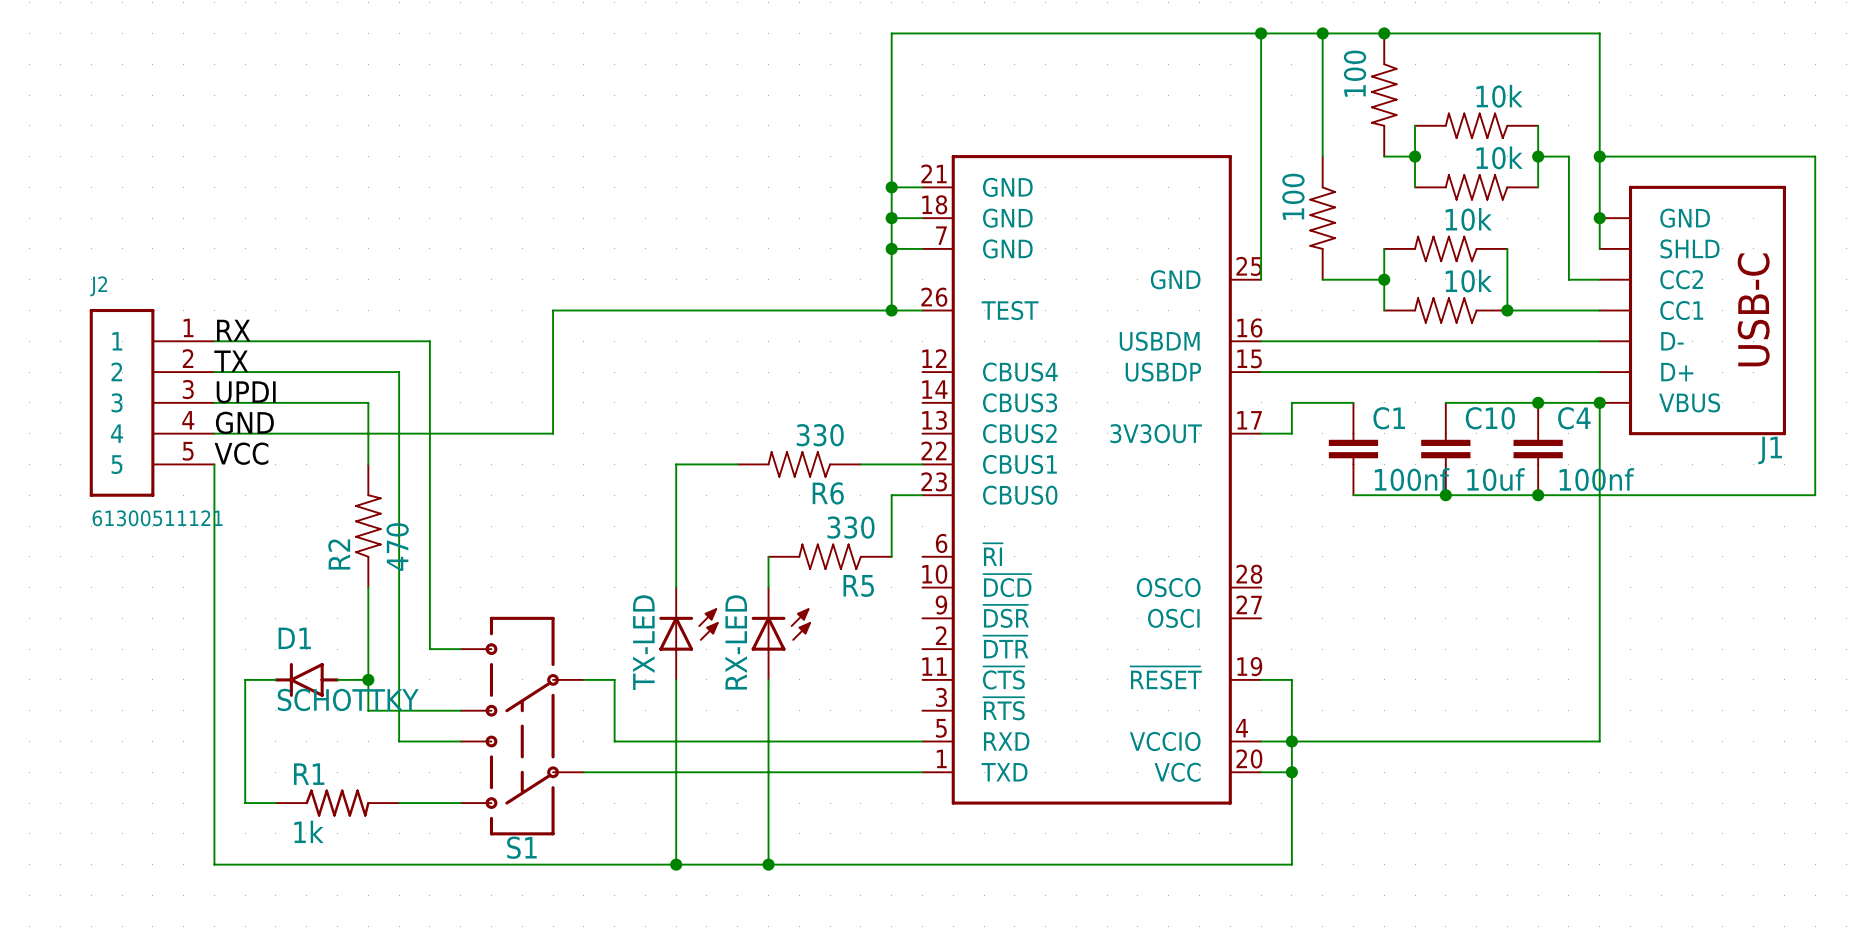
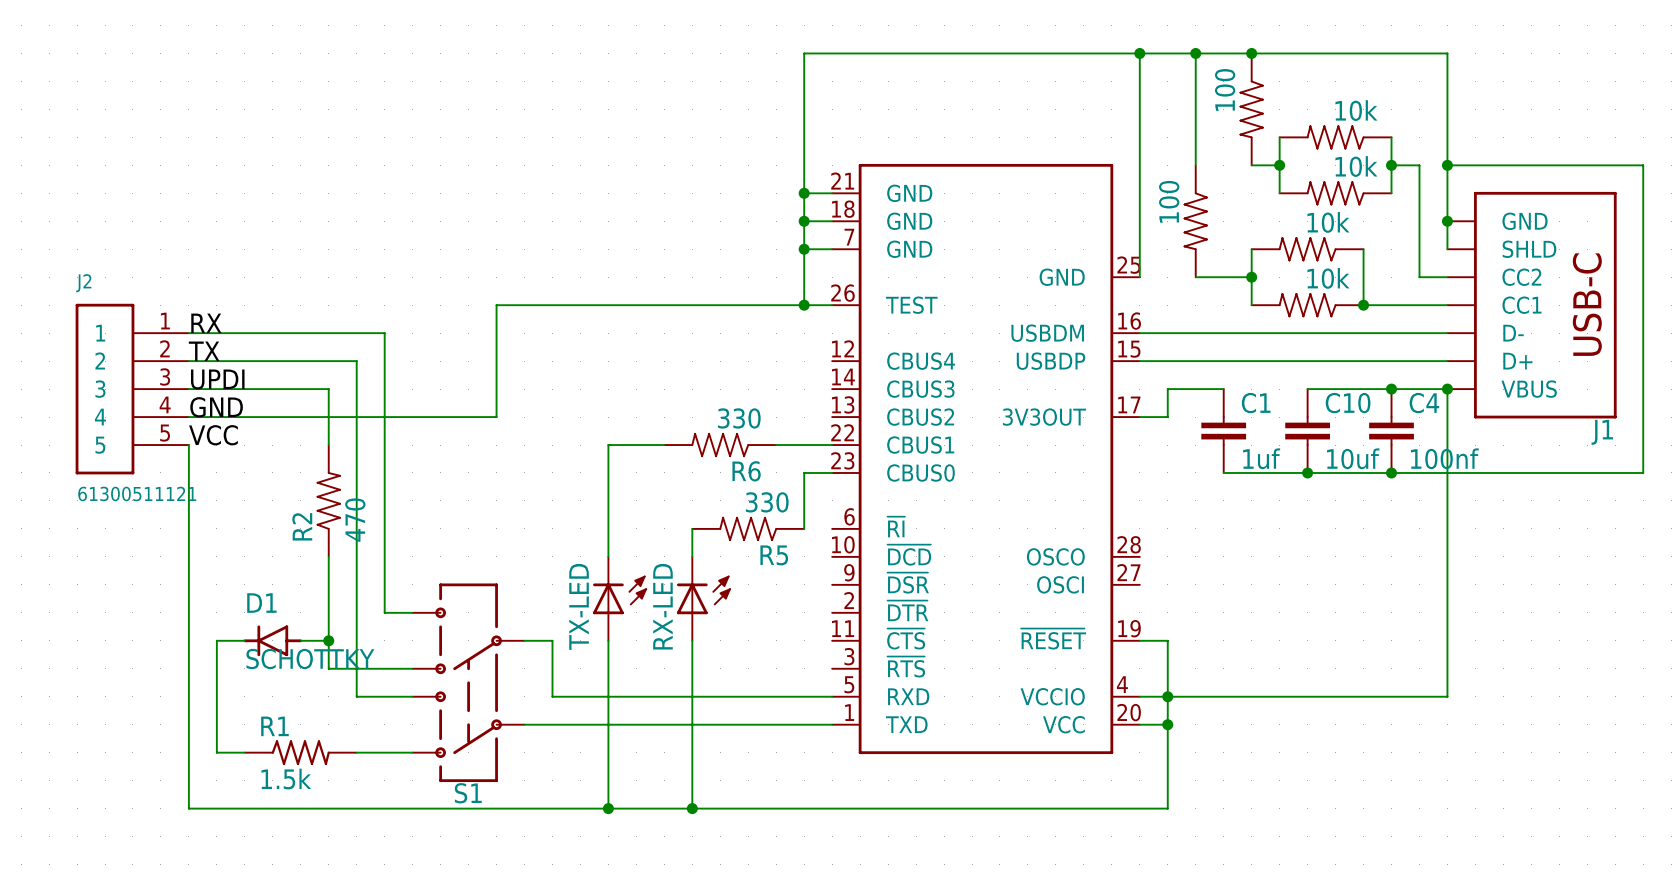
C1 value: 100nf (1412, 479) -> 1uf (1261, 458)
R1 value: 1k (308, 831) -> 1.5k (286, 779)

